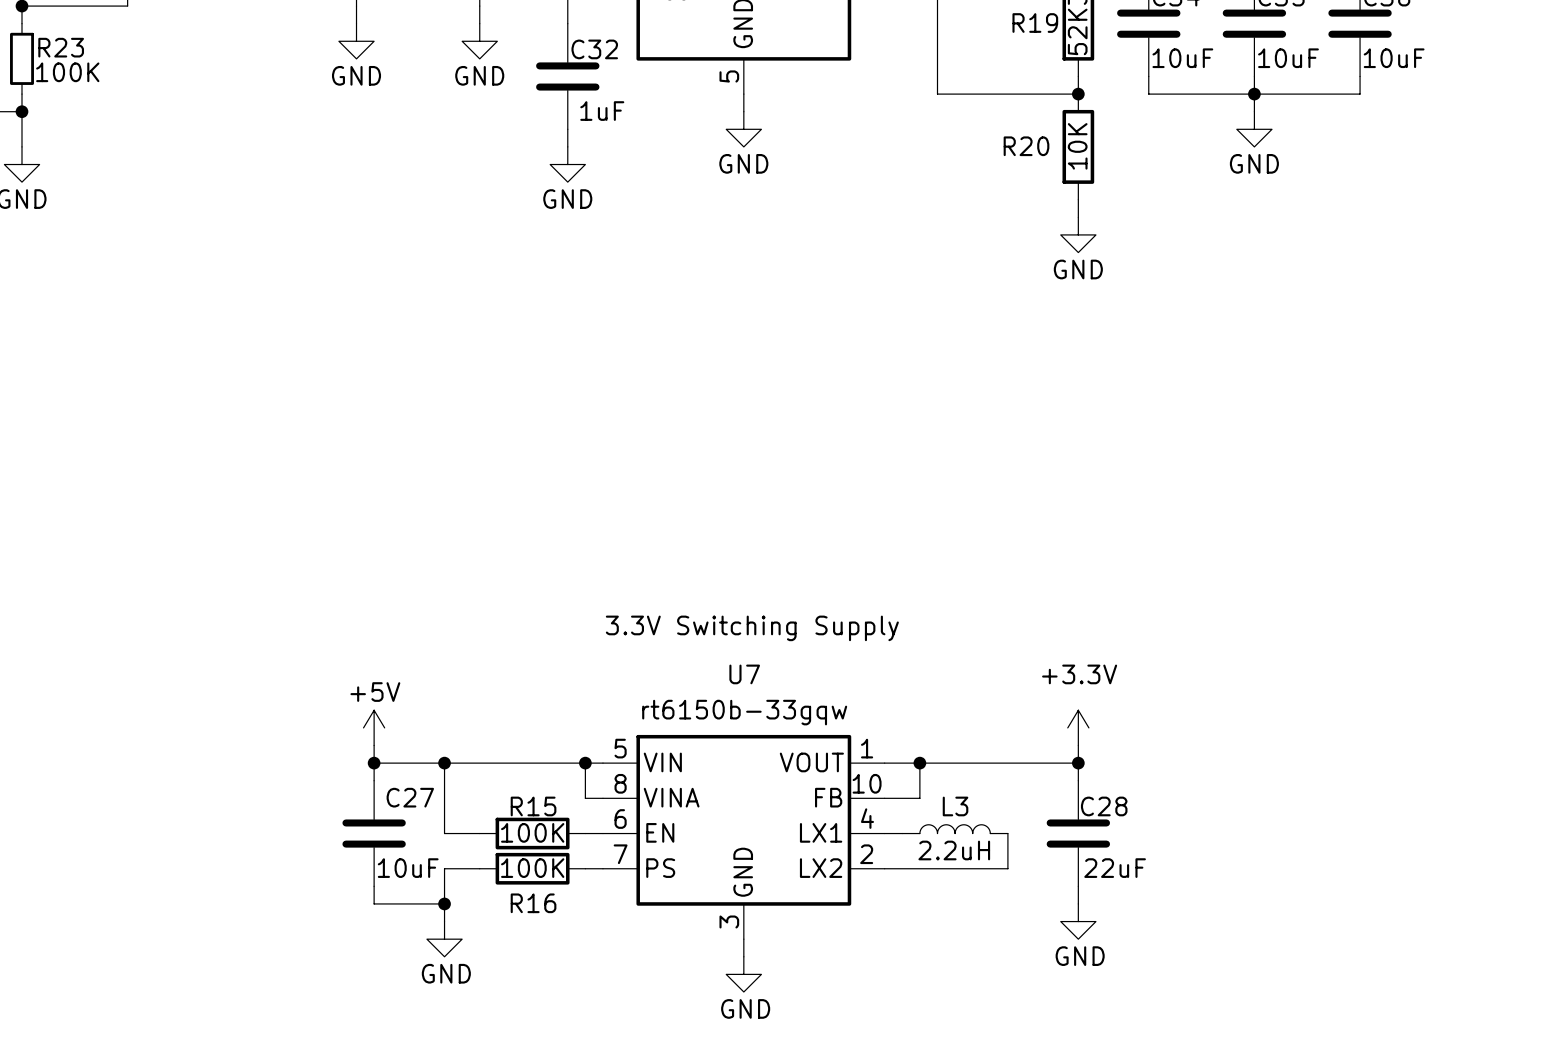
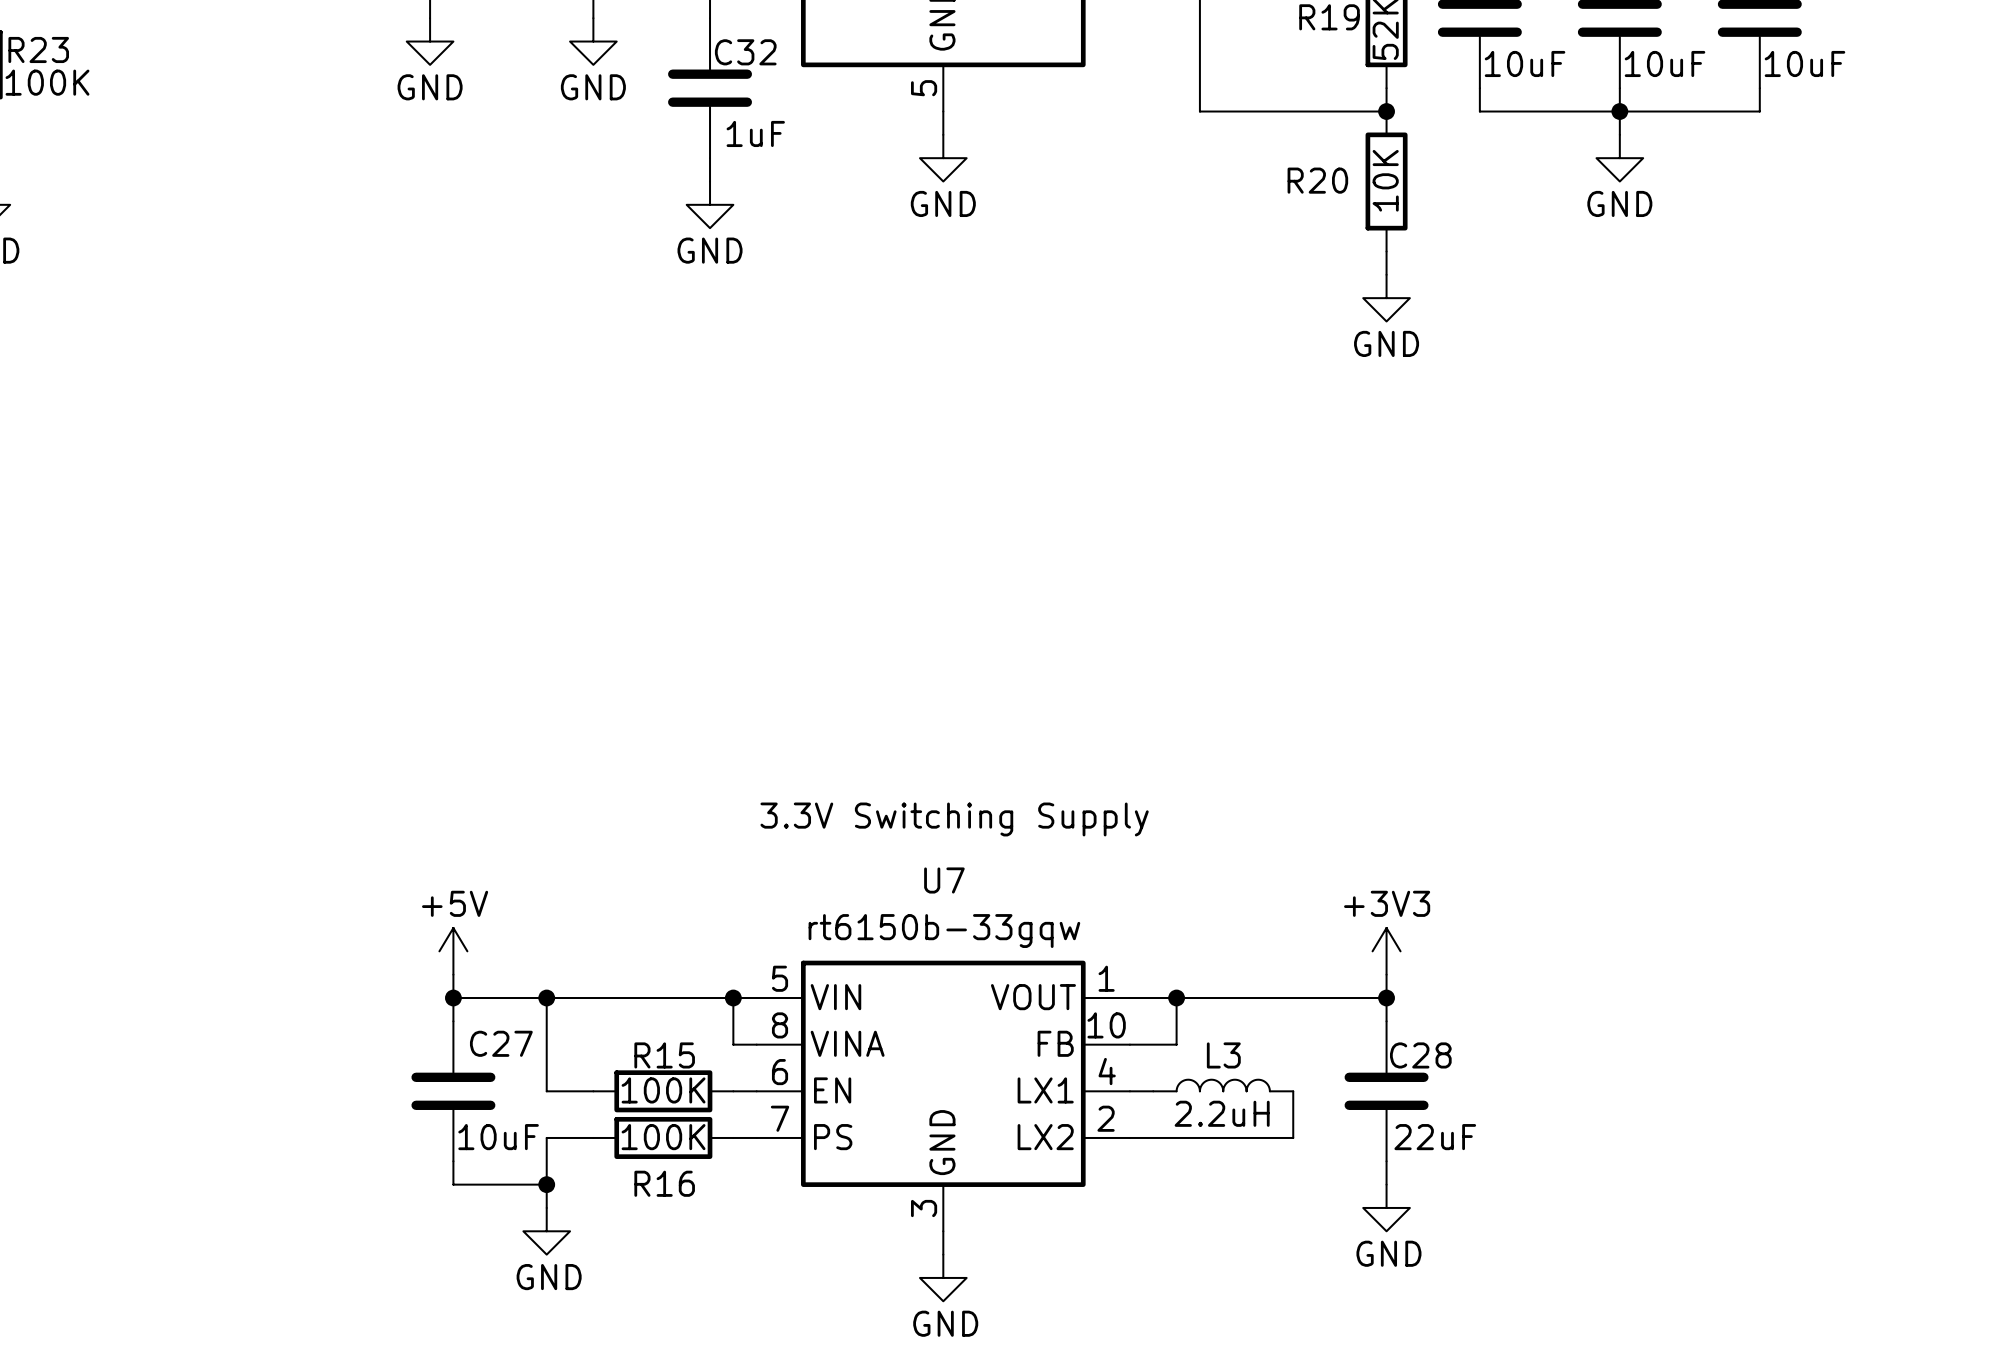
power symbol: +3.3V (1078, 727) -> +3V3 (1386, 951)

